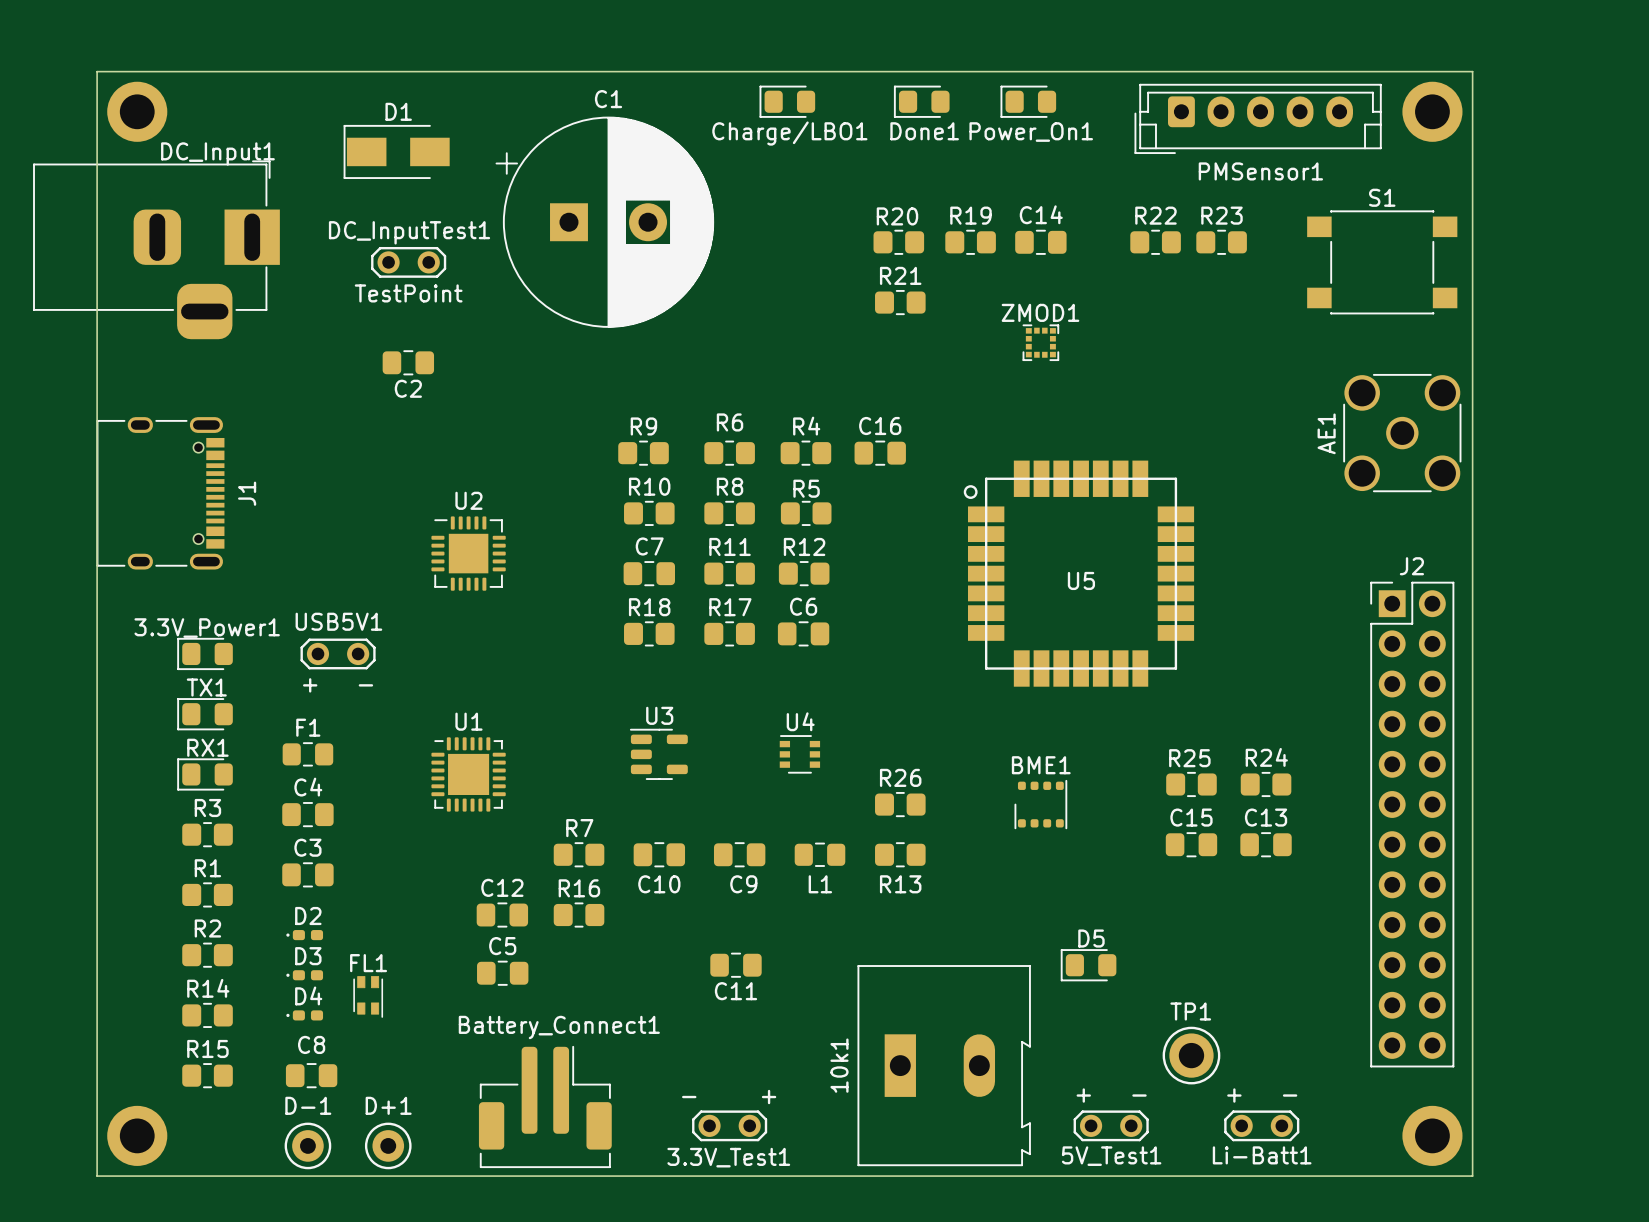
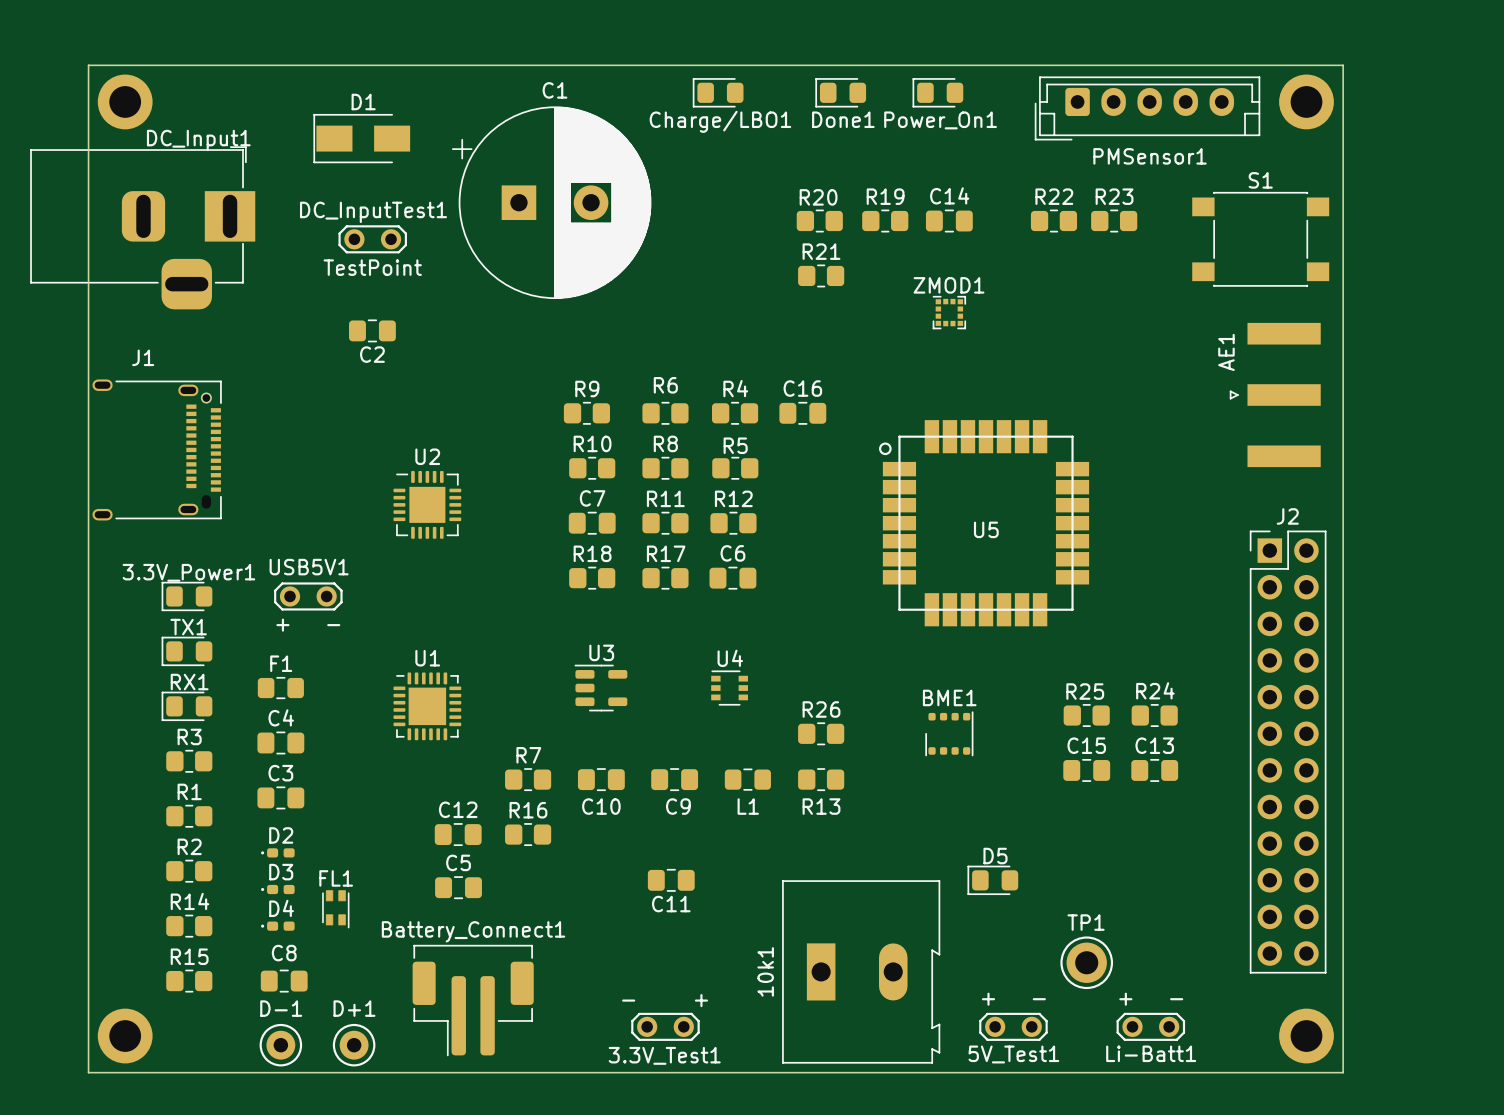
AE1 footprint: [1343, 373, 1462, 493] -> [1229, 322, 1321, 468]
J1 footprint: [96, 417, 225, 570] -> [92, 379, 222, 521]
AE1 name position: AE1 (1326, 433) -> AE1 (1226, 352)
J1 name position: J1 (247, 493) -> J1 (143, 357)
Battery_Connect1 rotation: 0° (545, 1106) -> 180° (473, 1000)

